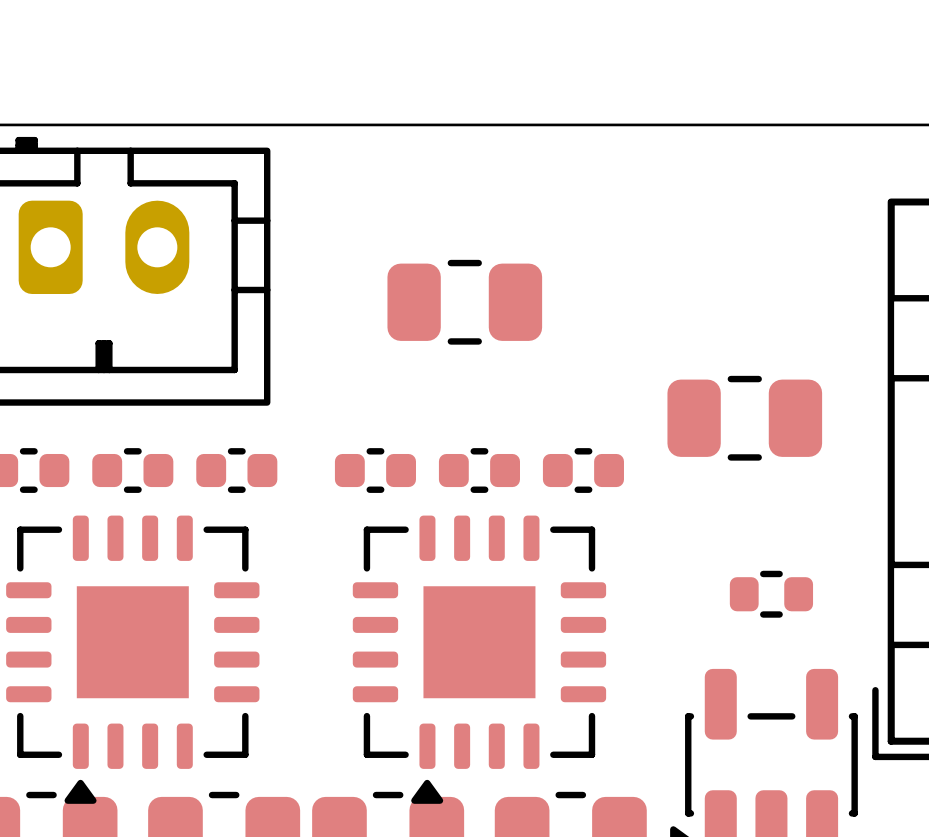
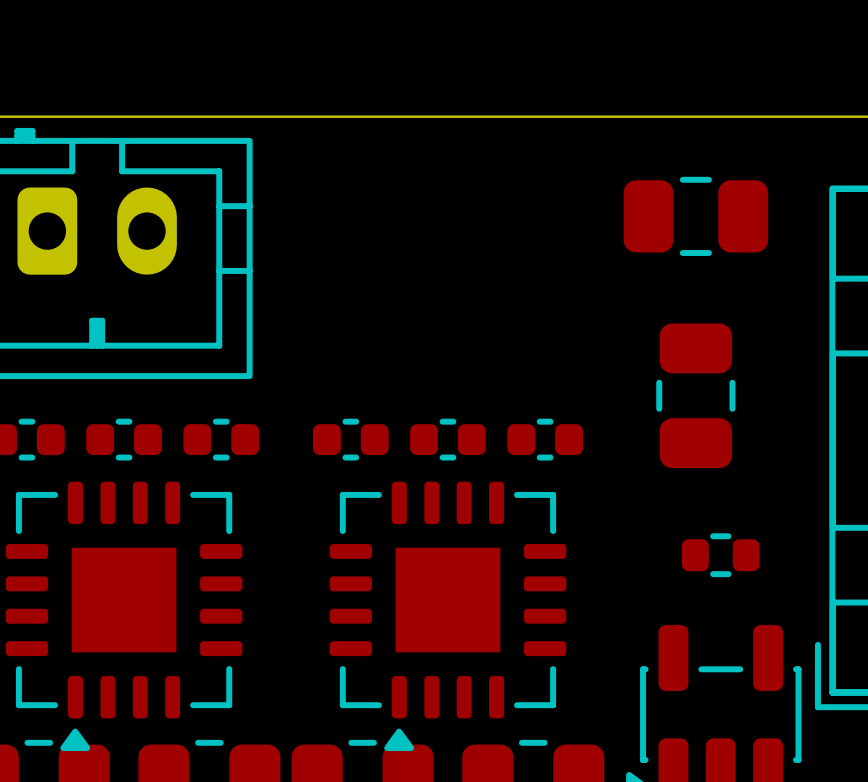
part position: (464, 302) -> (695, 216)
part rotation: 0° (744, 418) -> 90° clockwise (695, 395)

